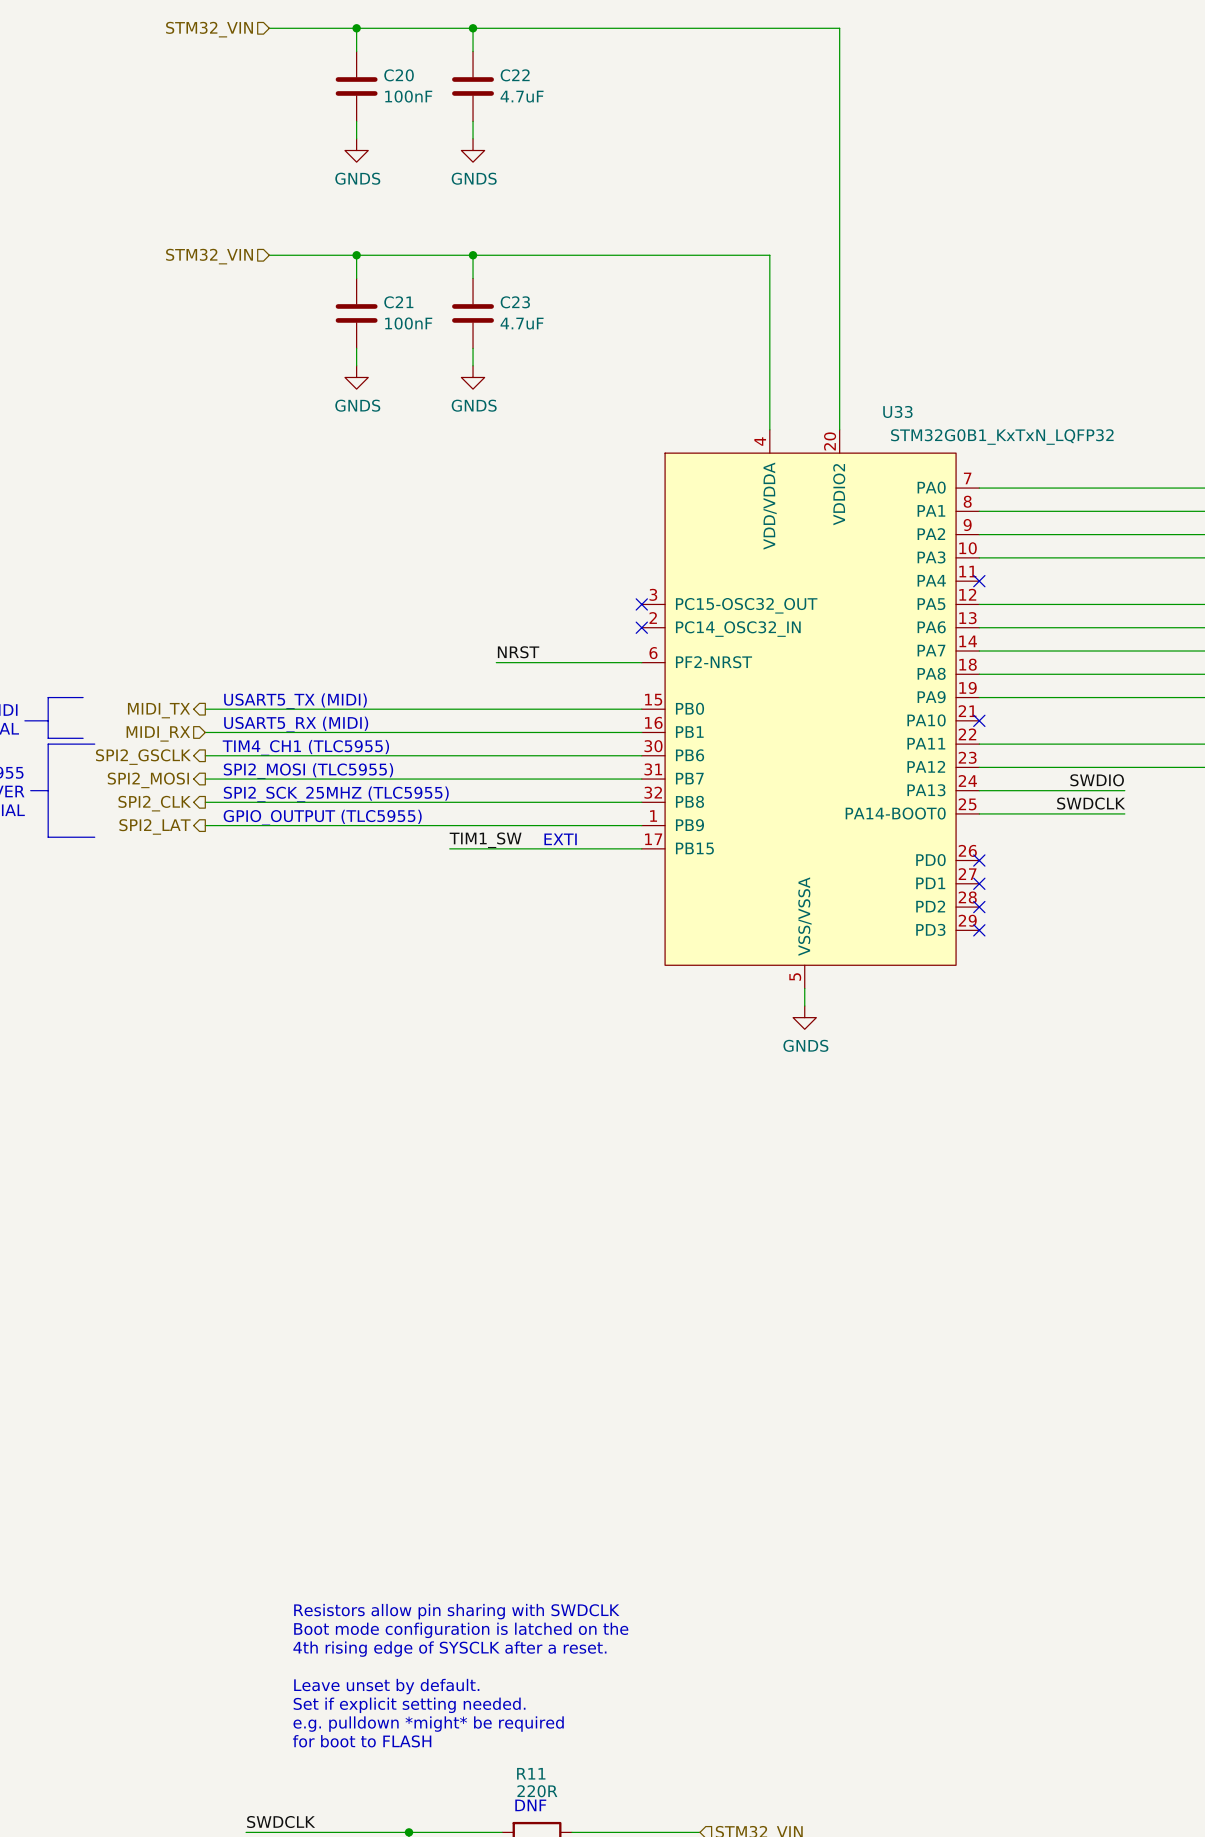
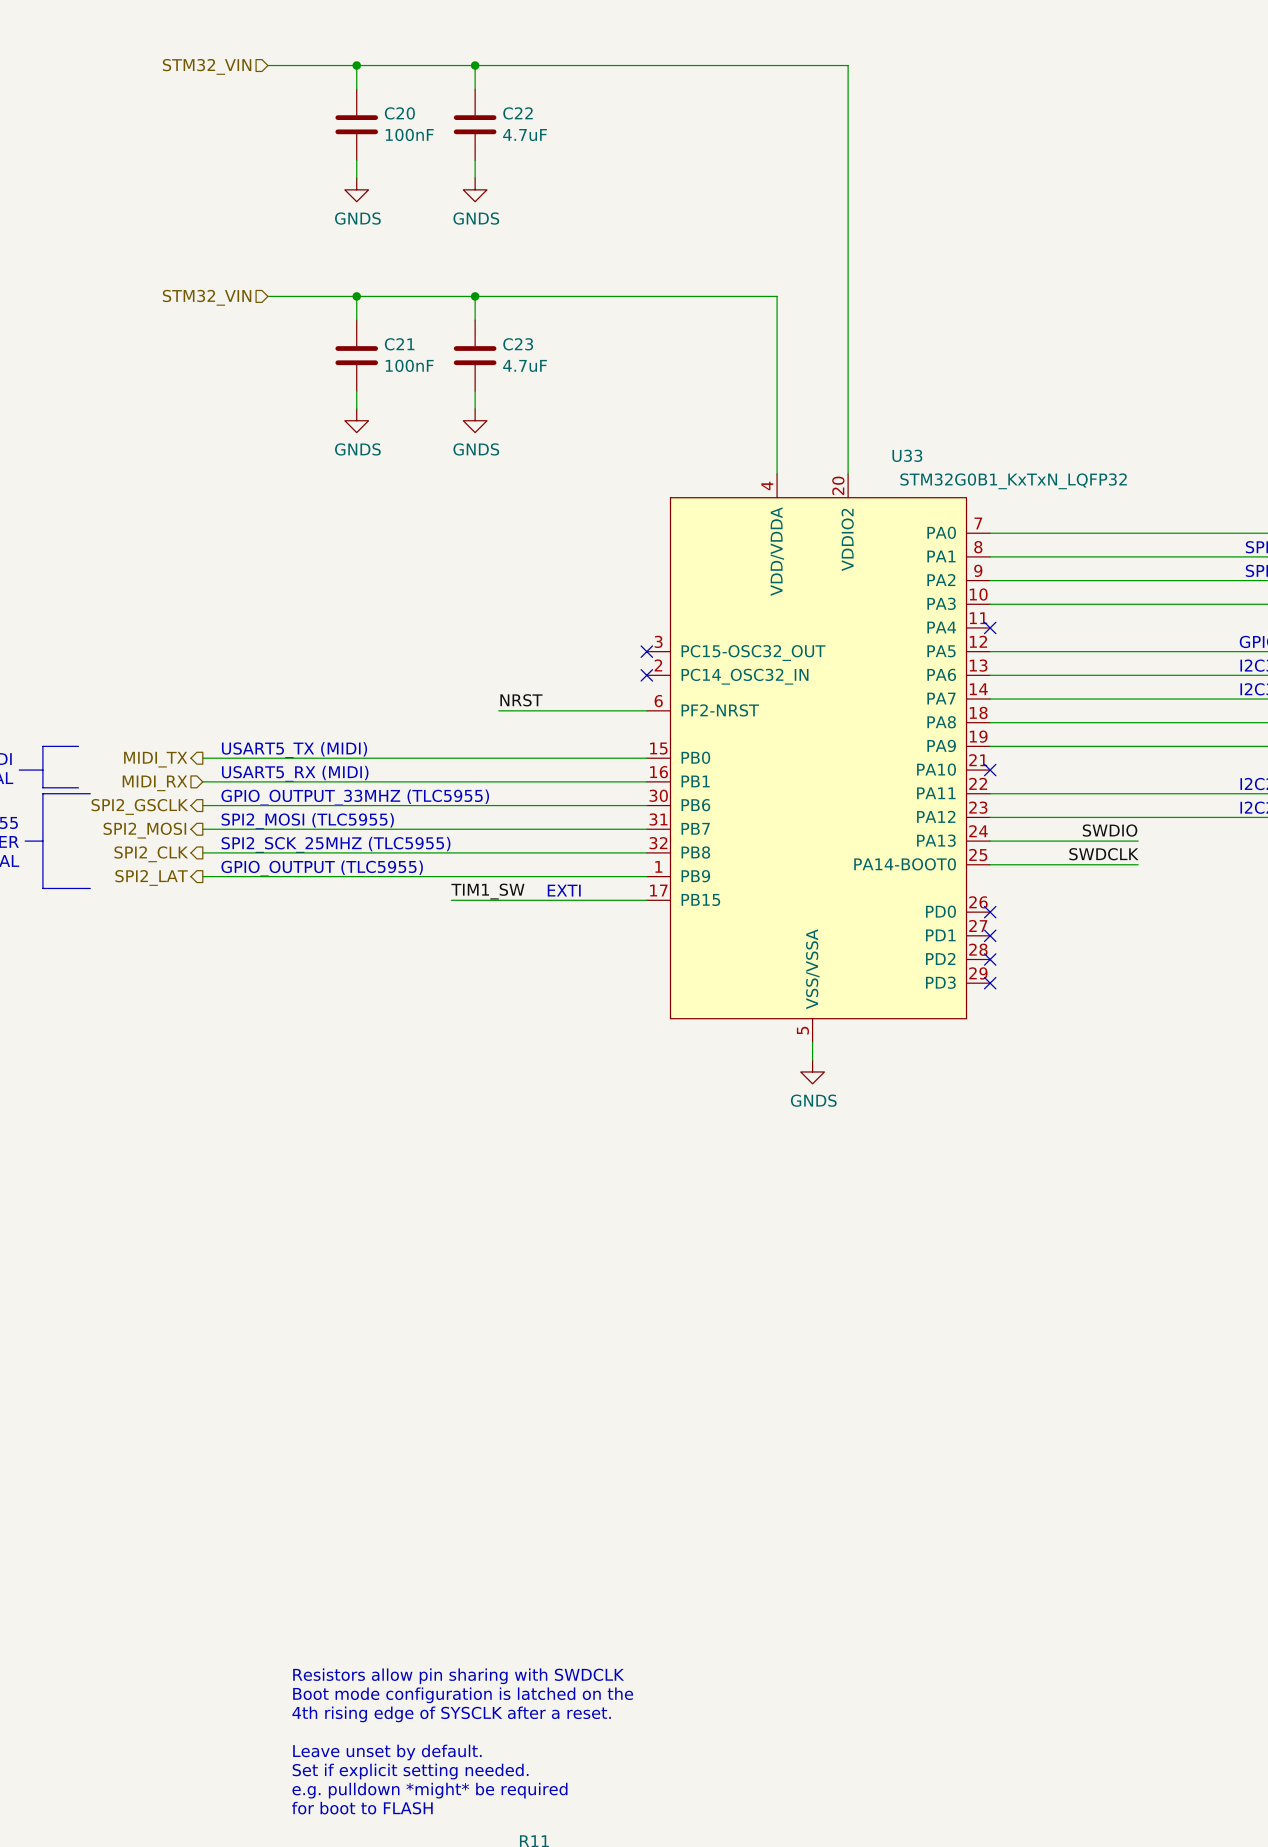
text: TIM4_CH1 (TLC5955) (305, 747) -> GPIO_OUTPUT_33MHZ (TLC5955) (355, 797)

